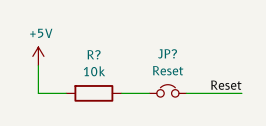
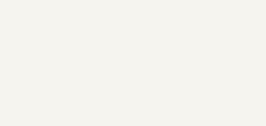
power symbol: +5V (38, 56) -> none
wire: (38, 65) (38, 93) (66, 93) -> none
label: Reset (226, 85) -> none
JP?: Reset (167, 90) -> none
R?: 10k (93, 93) -> none
wire: (121, 93) (149, 93) -> none
wire: (186, 93) (241, 93) -> none

